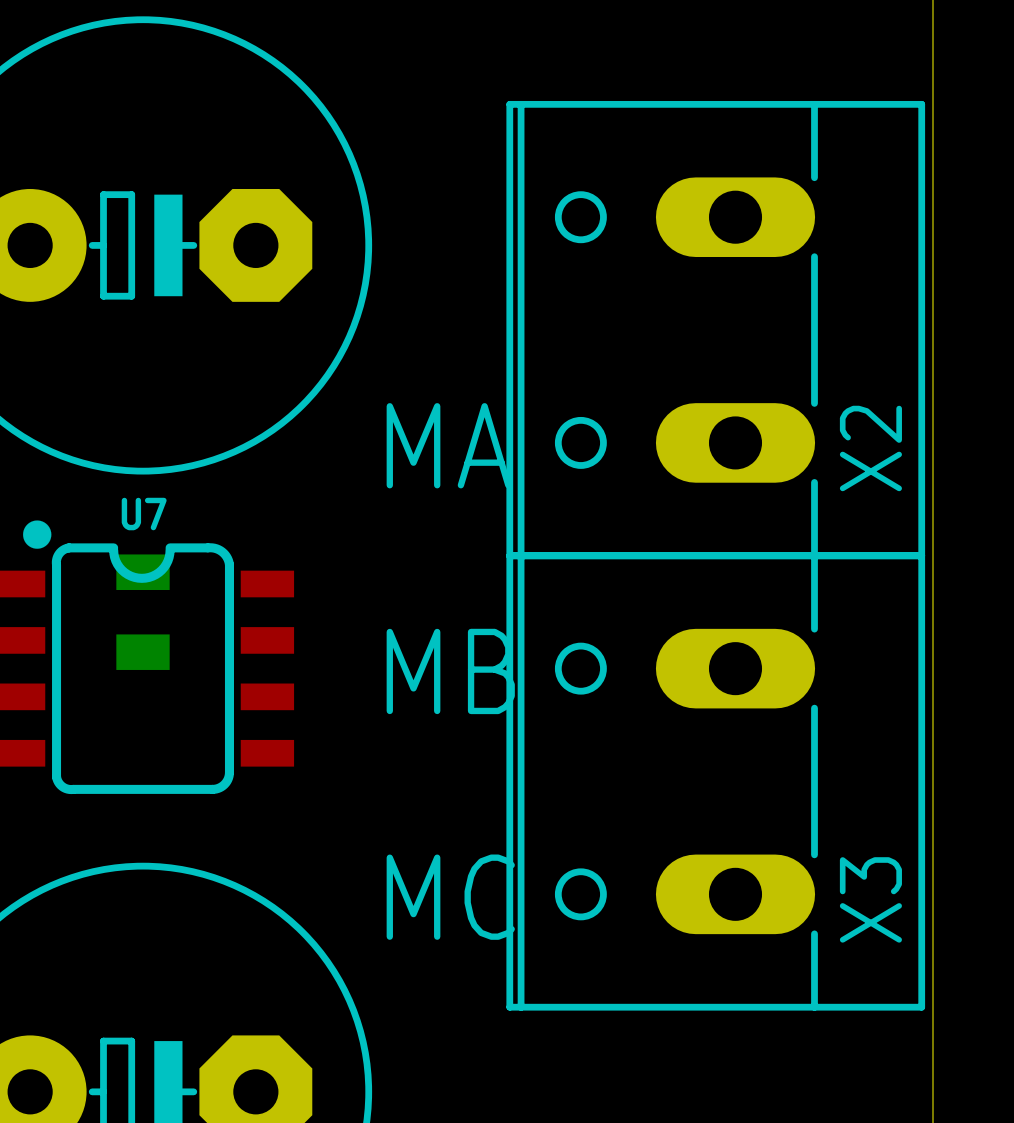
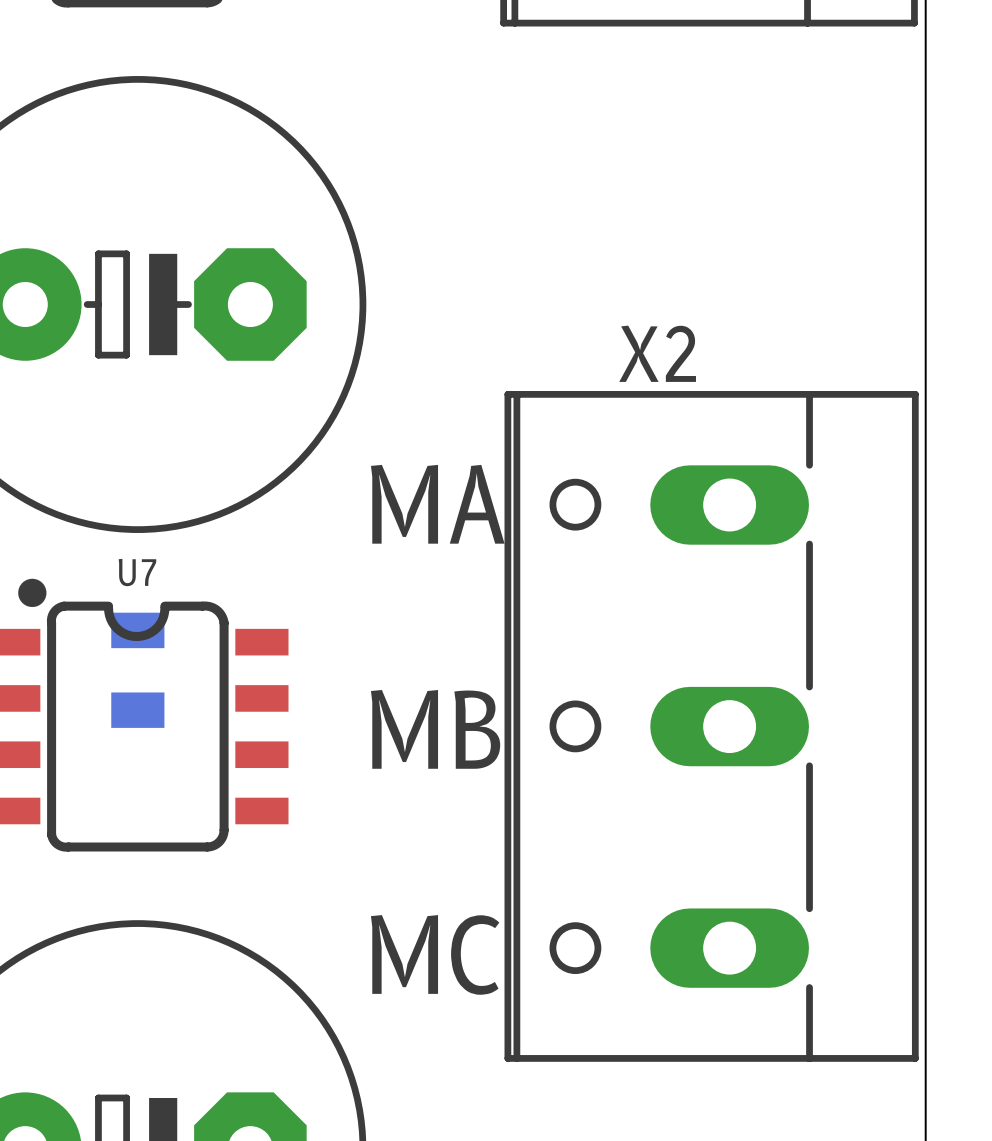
X2 footprint: [506, 100, 926, 560] -> [504, 390, 919, 1062]
X2 name position: X2 (870, 448) -> X2 (657, 353)
X3: (715, 781) -> none

